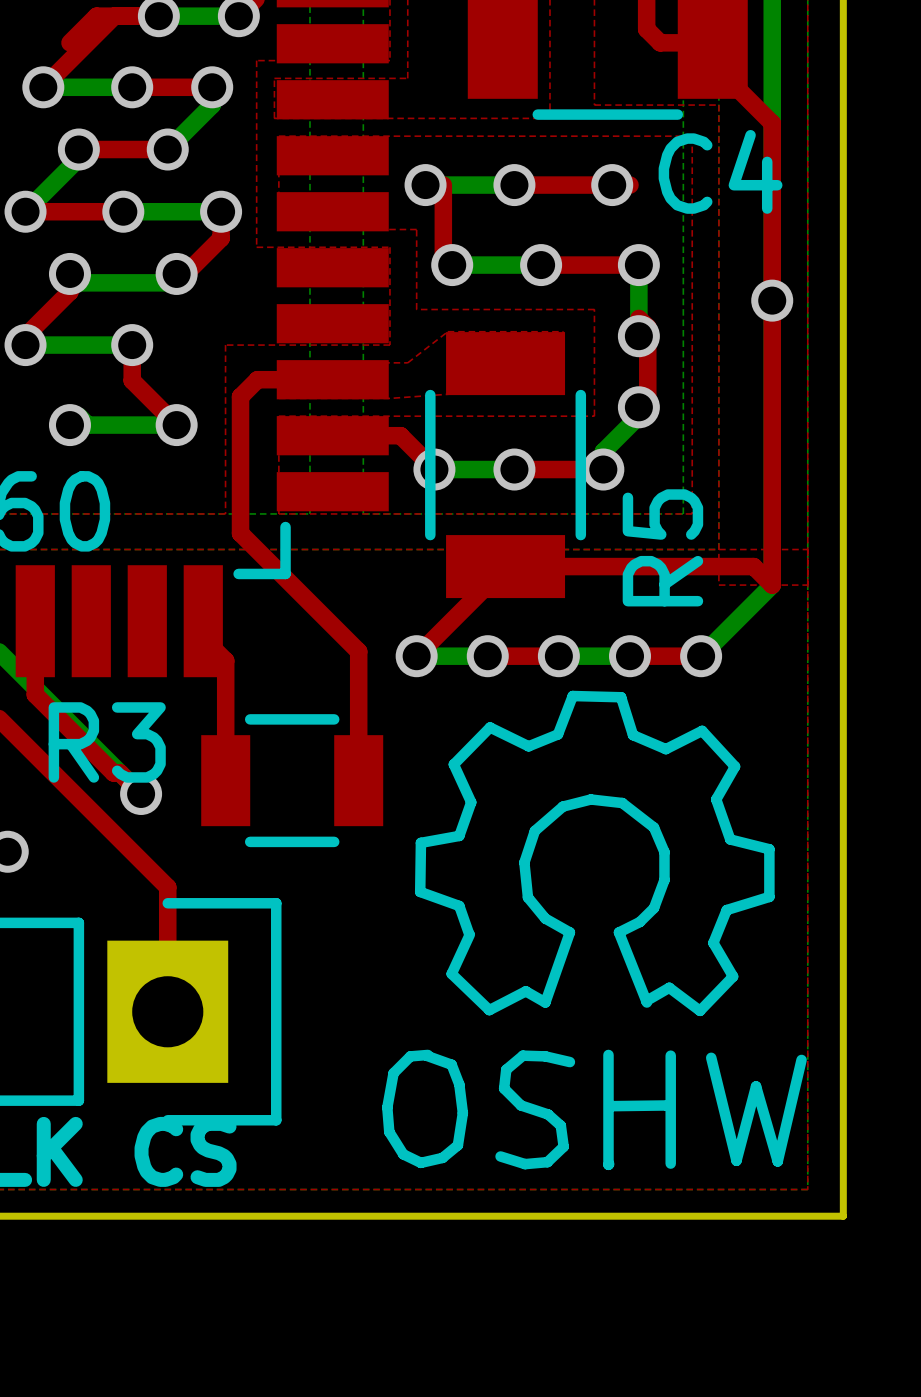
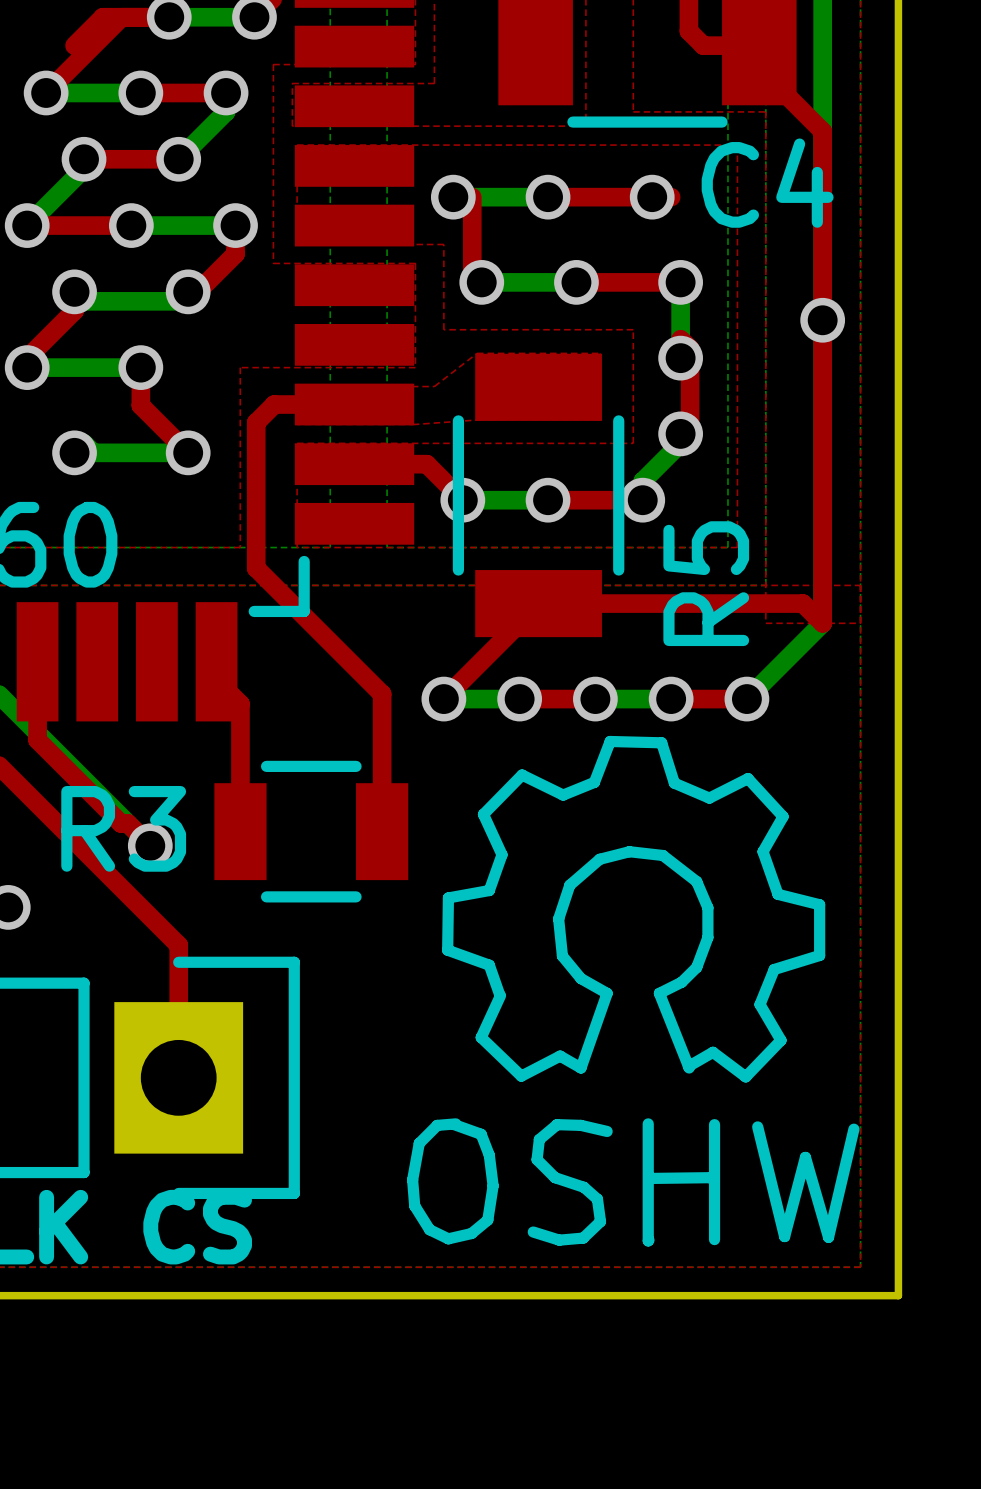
R3 name position: R3 (107, 742) -> R3 (123, 828)

